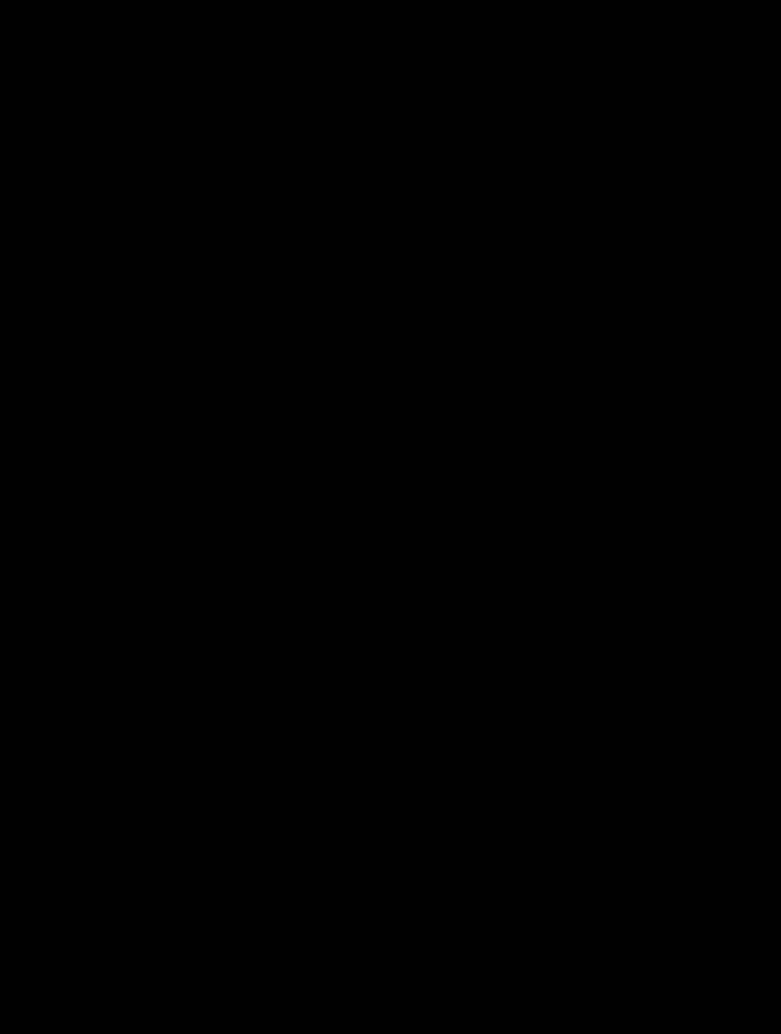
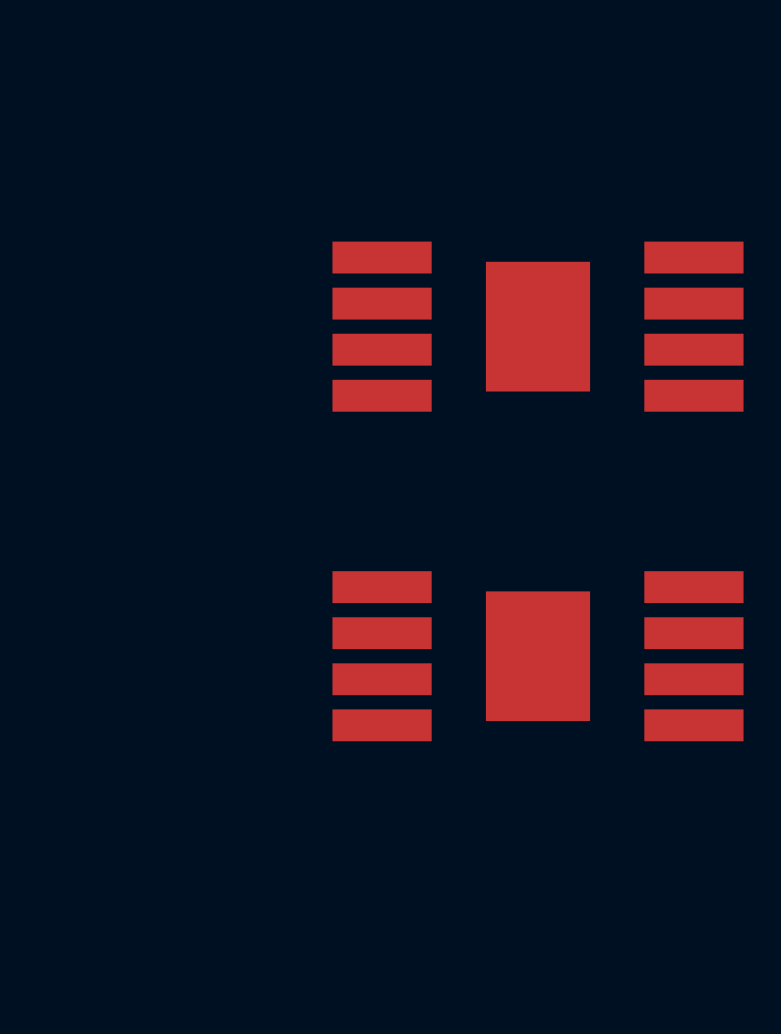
part: none -> (538, 326)
part: none -> (538, 656)

